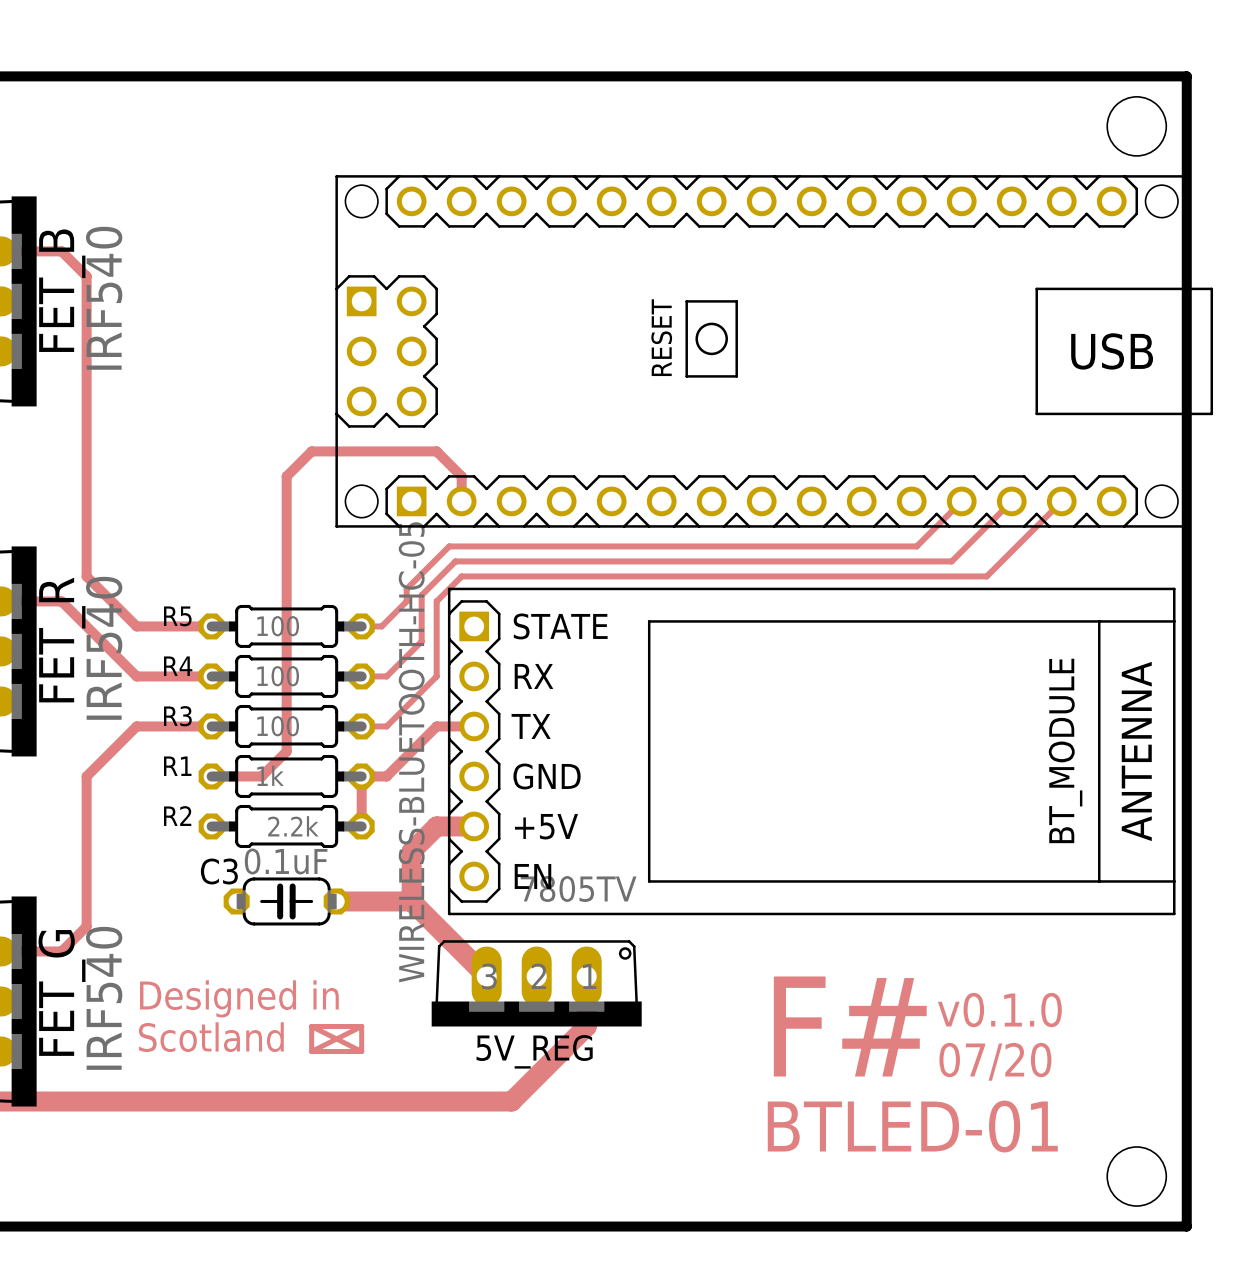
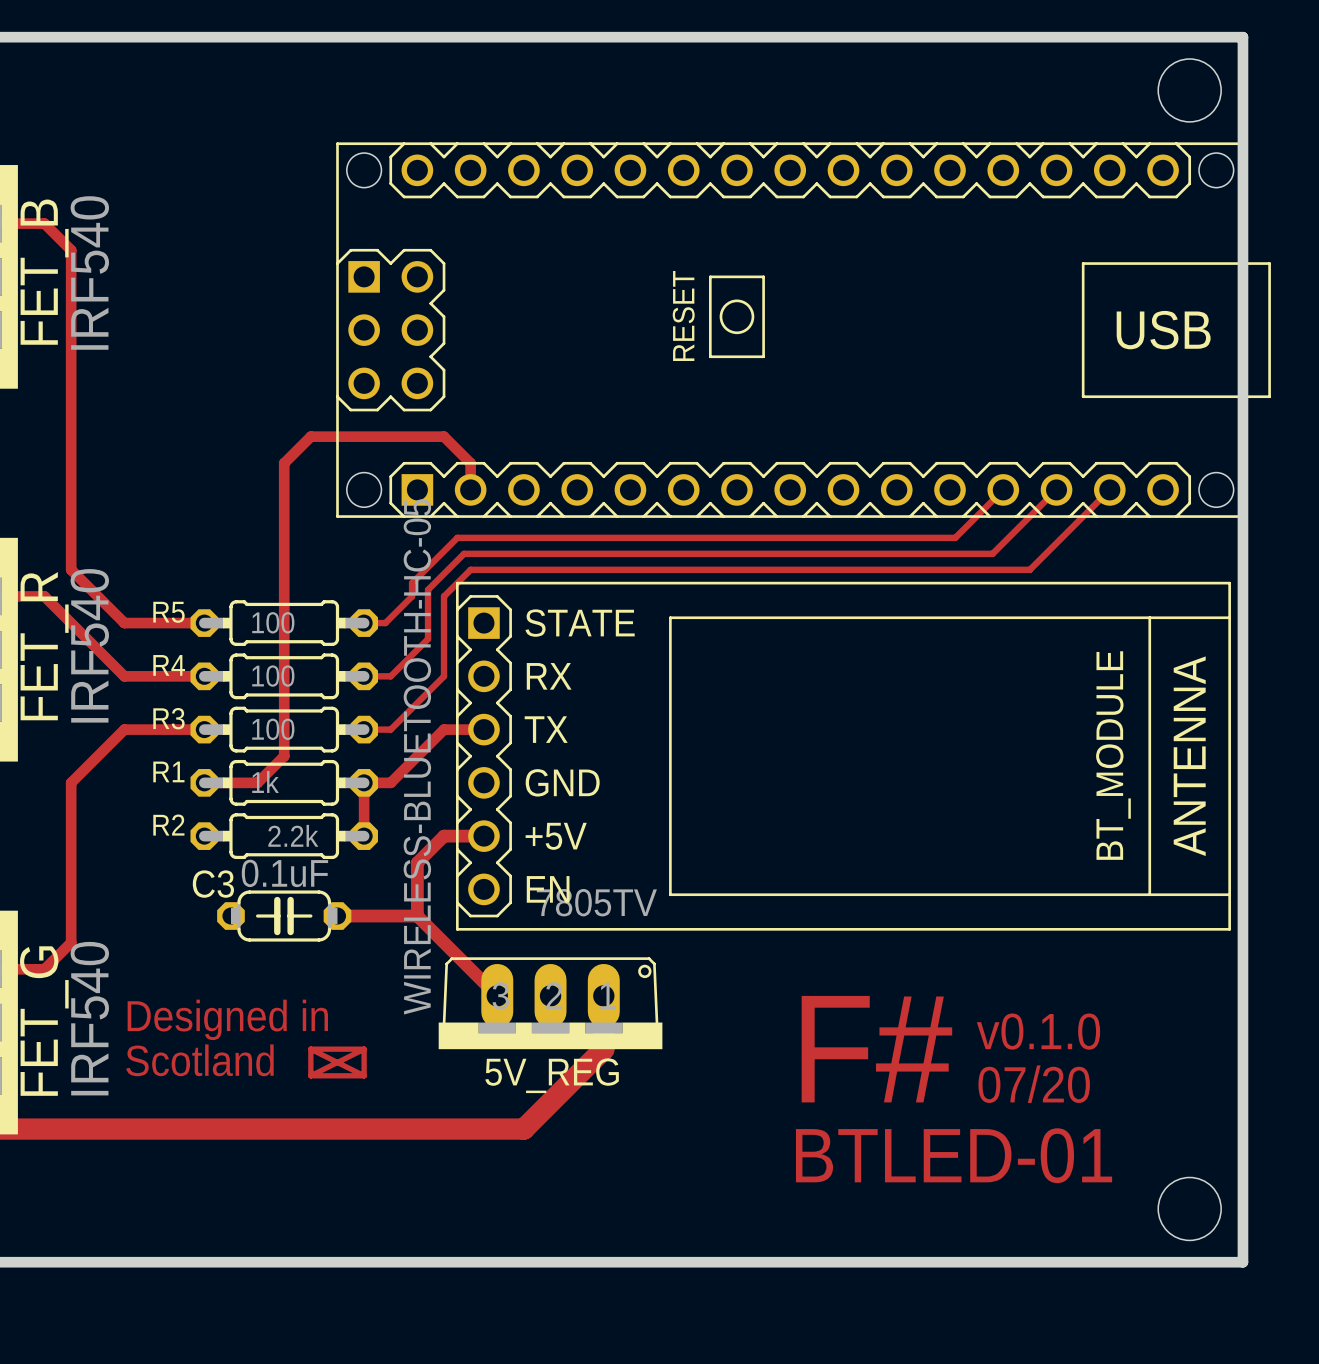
track width: thick (474, 826) (436, 826) (411, 851) (411, 901) -> thin (483, 836) (444, 836) (417, 862) (417, 916)
track width: thick (336, 901) (411, 901) -> thin (337, 916) (417, 916)
track width: thick (411, 901) (486, 976) -> thin (417, 916) (497, 995)

